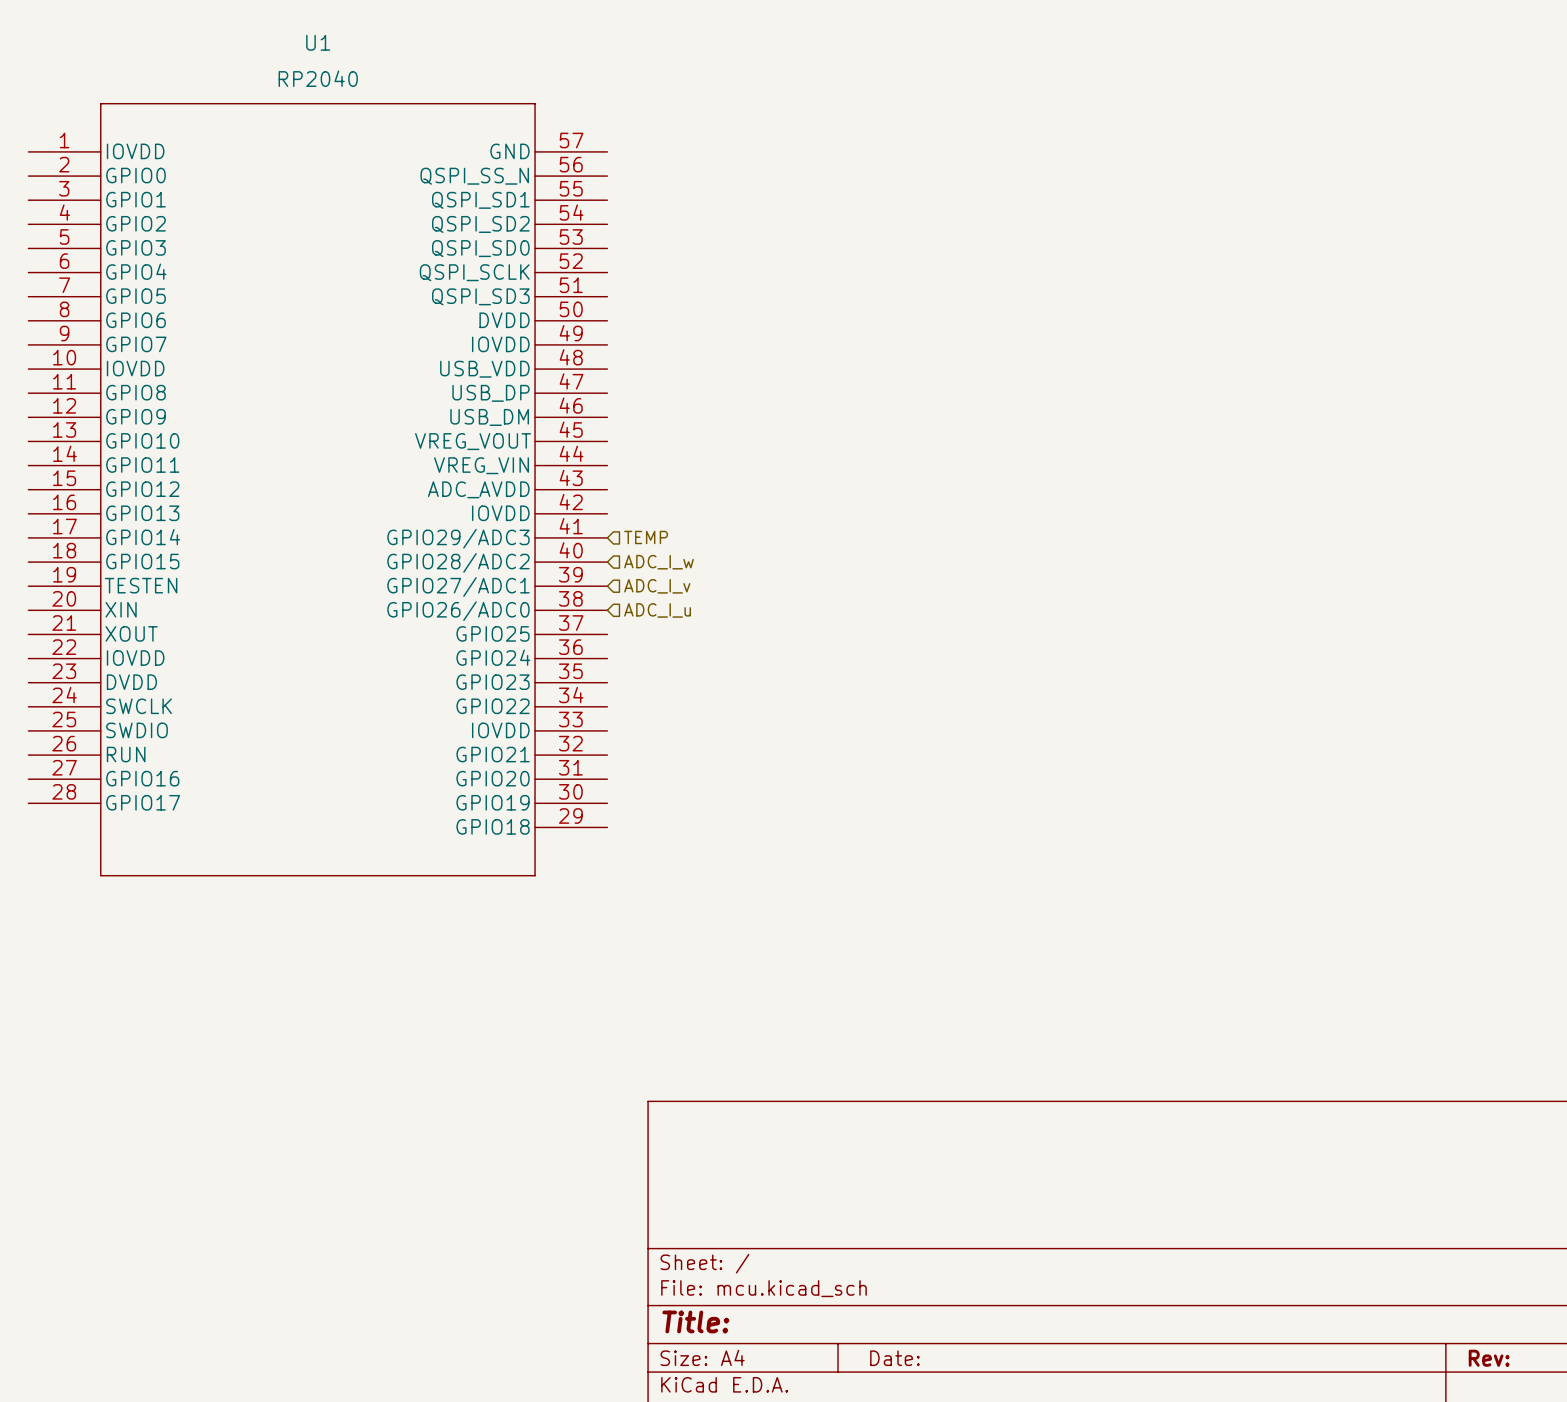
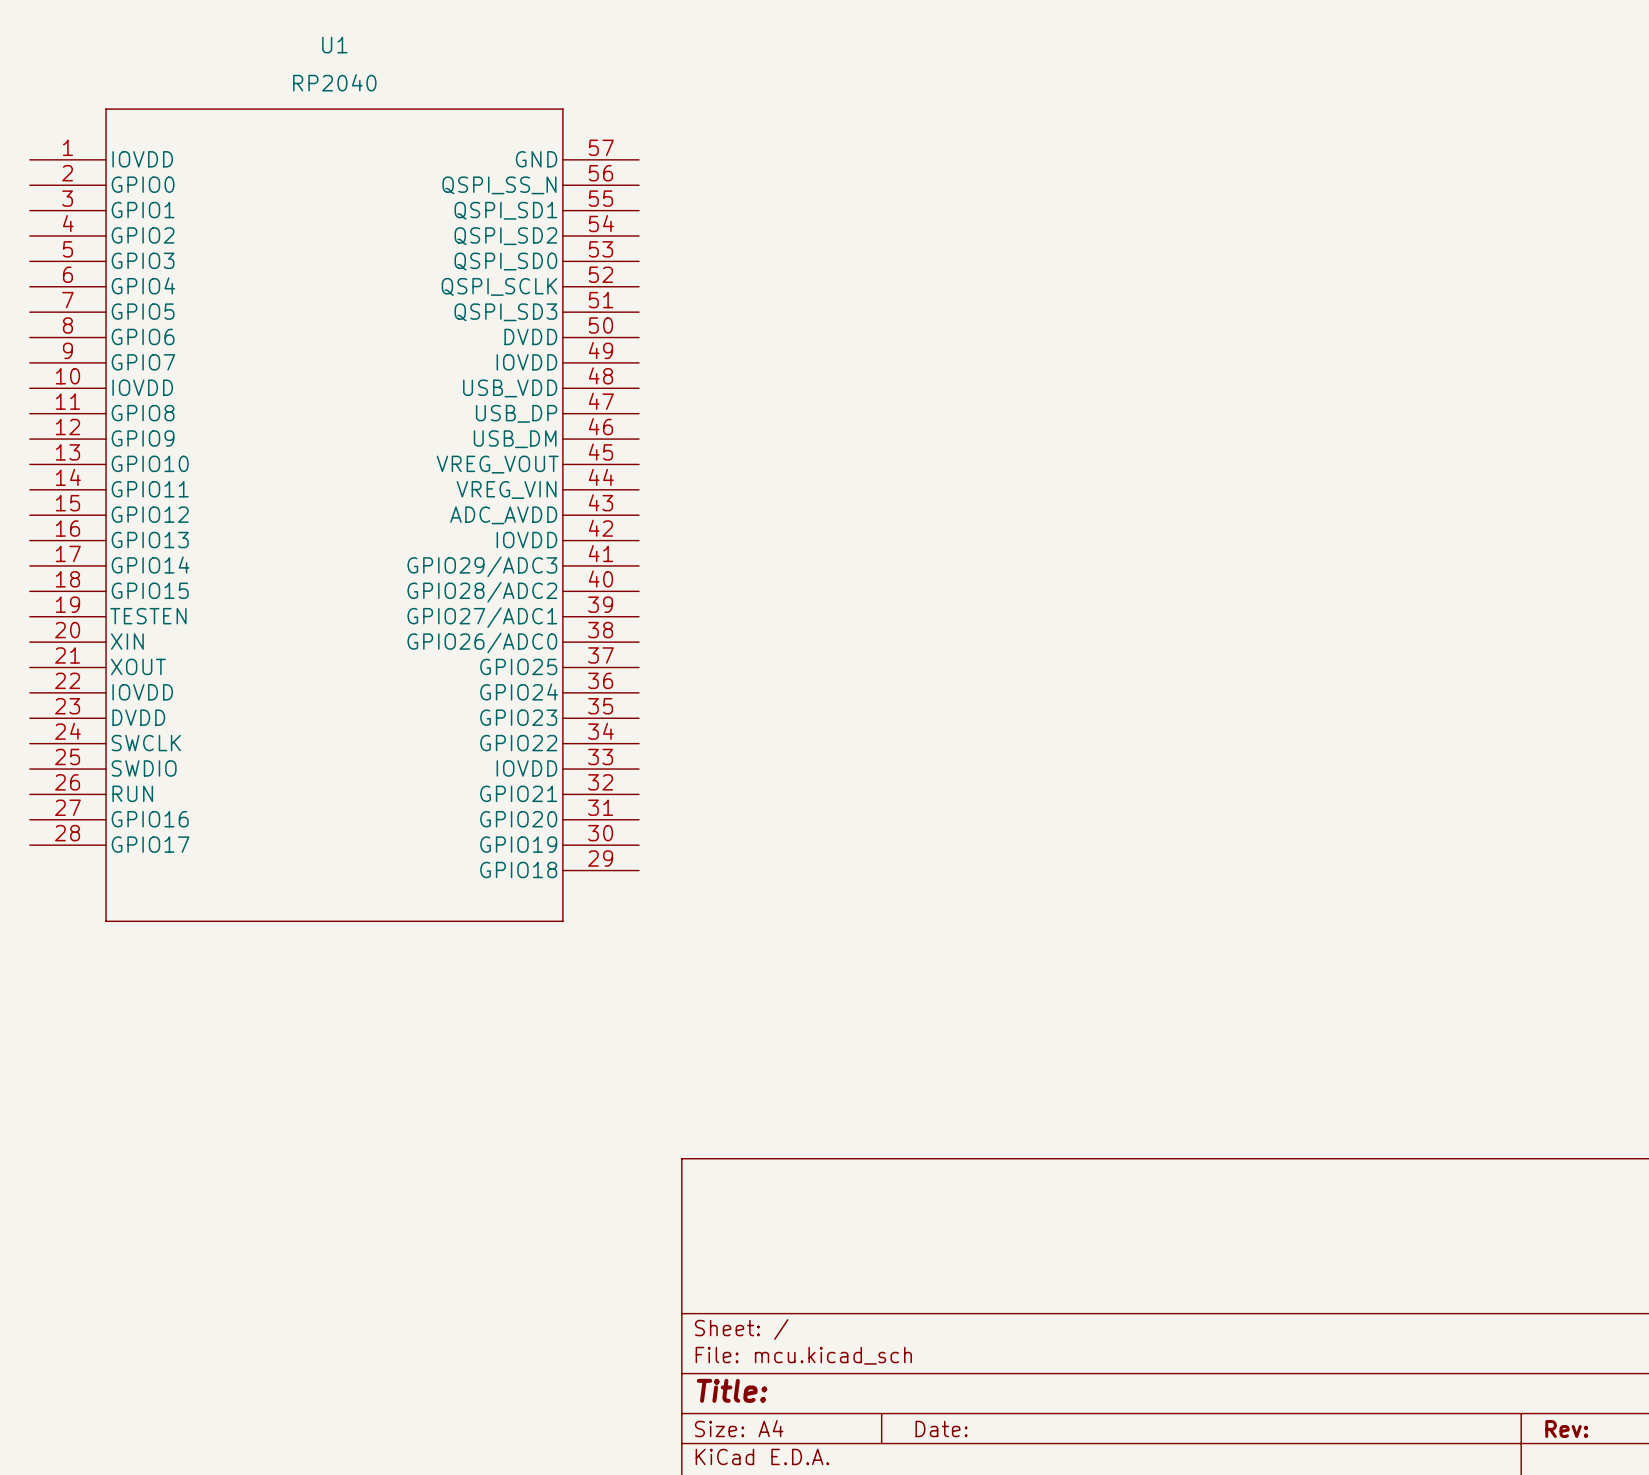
hierarchical label: TEMP (646, 537) -> none
hierarchical label: ADC_I_w (658, 562) -> none
hierarchical label: ADC_I_v (657, 586) -> none
hierarchical label: ADC_I_u (657, 610) -> none

